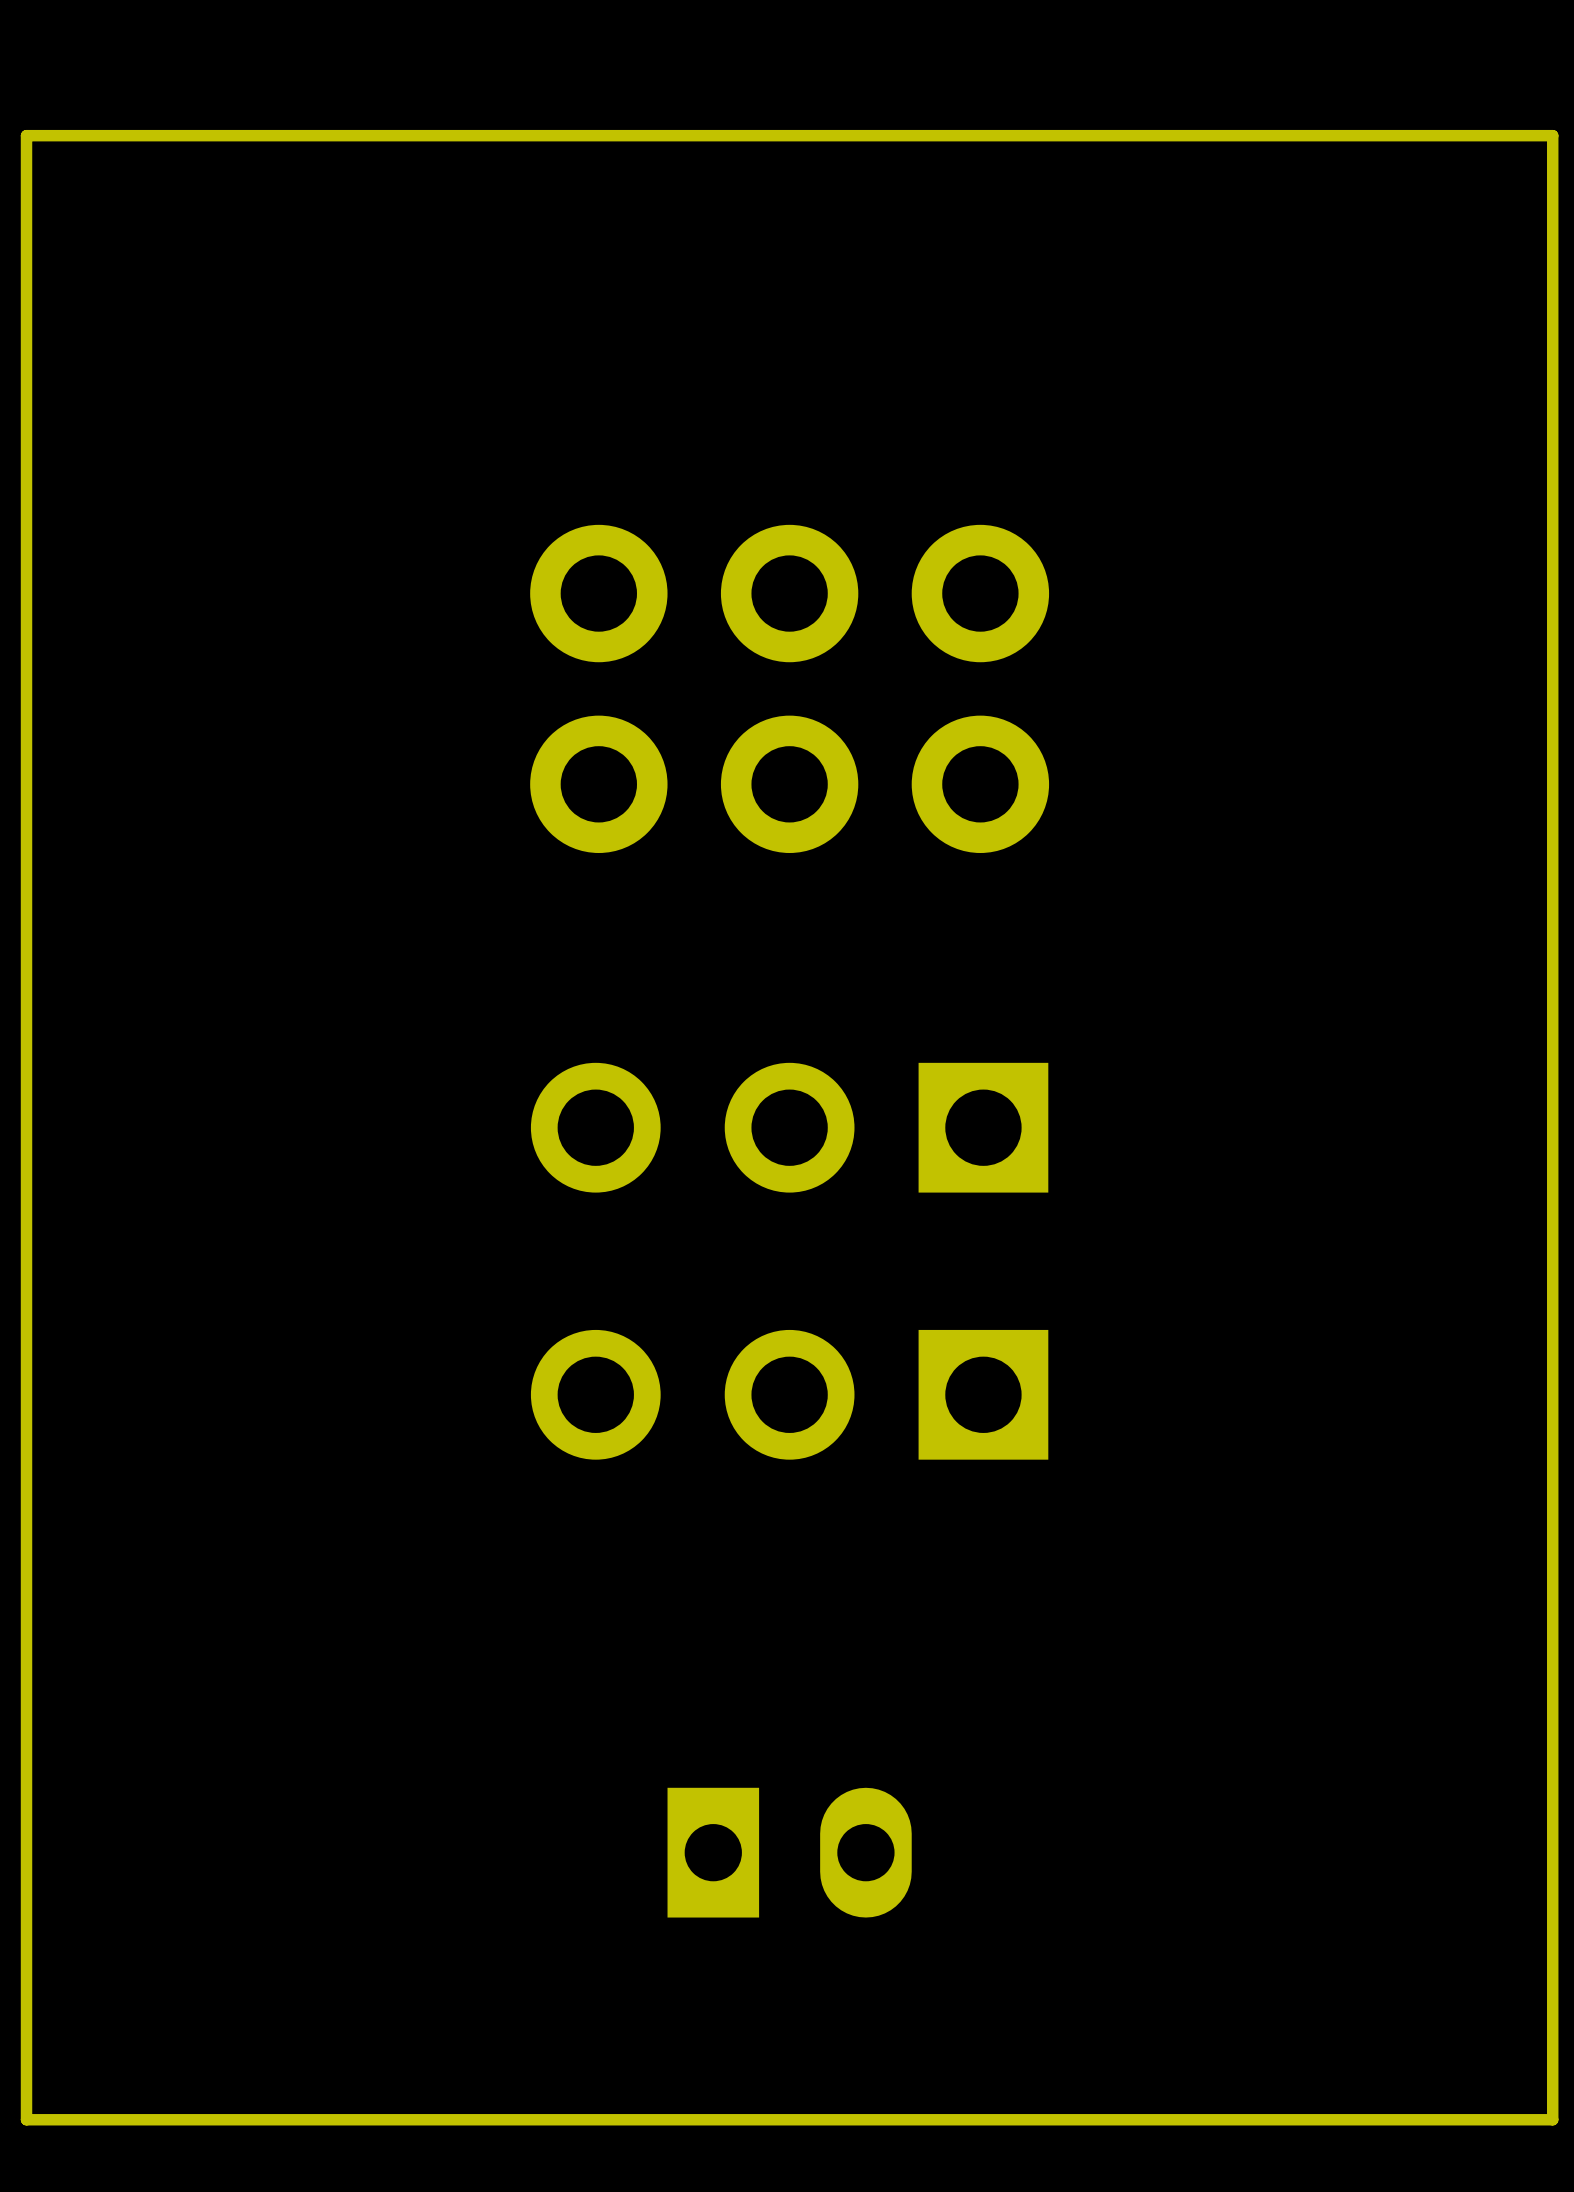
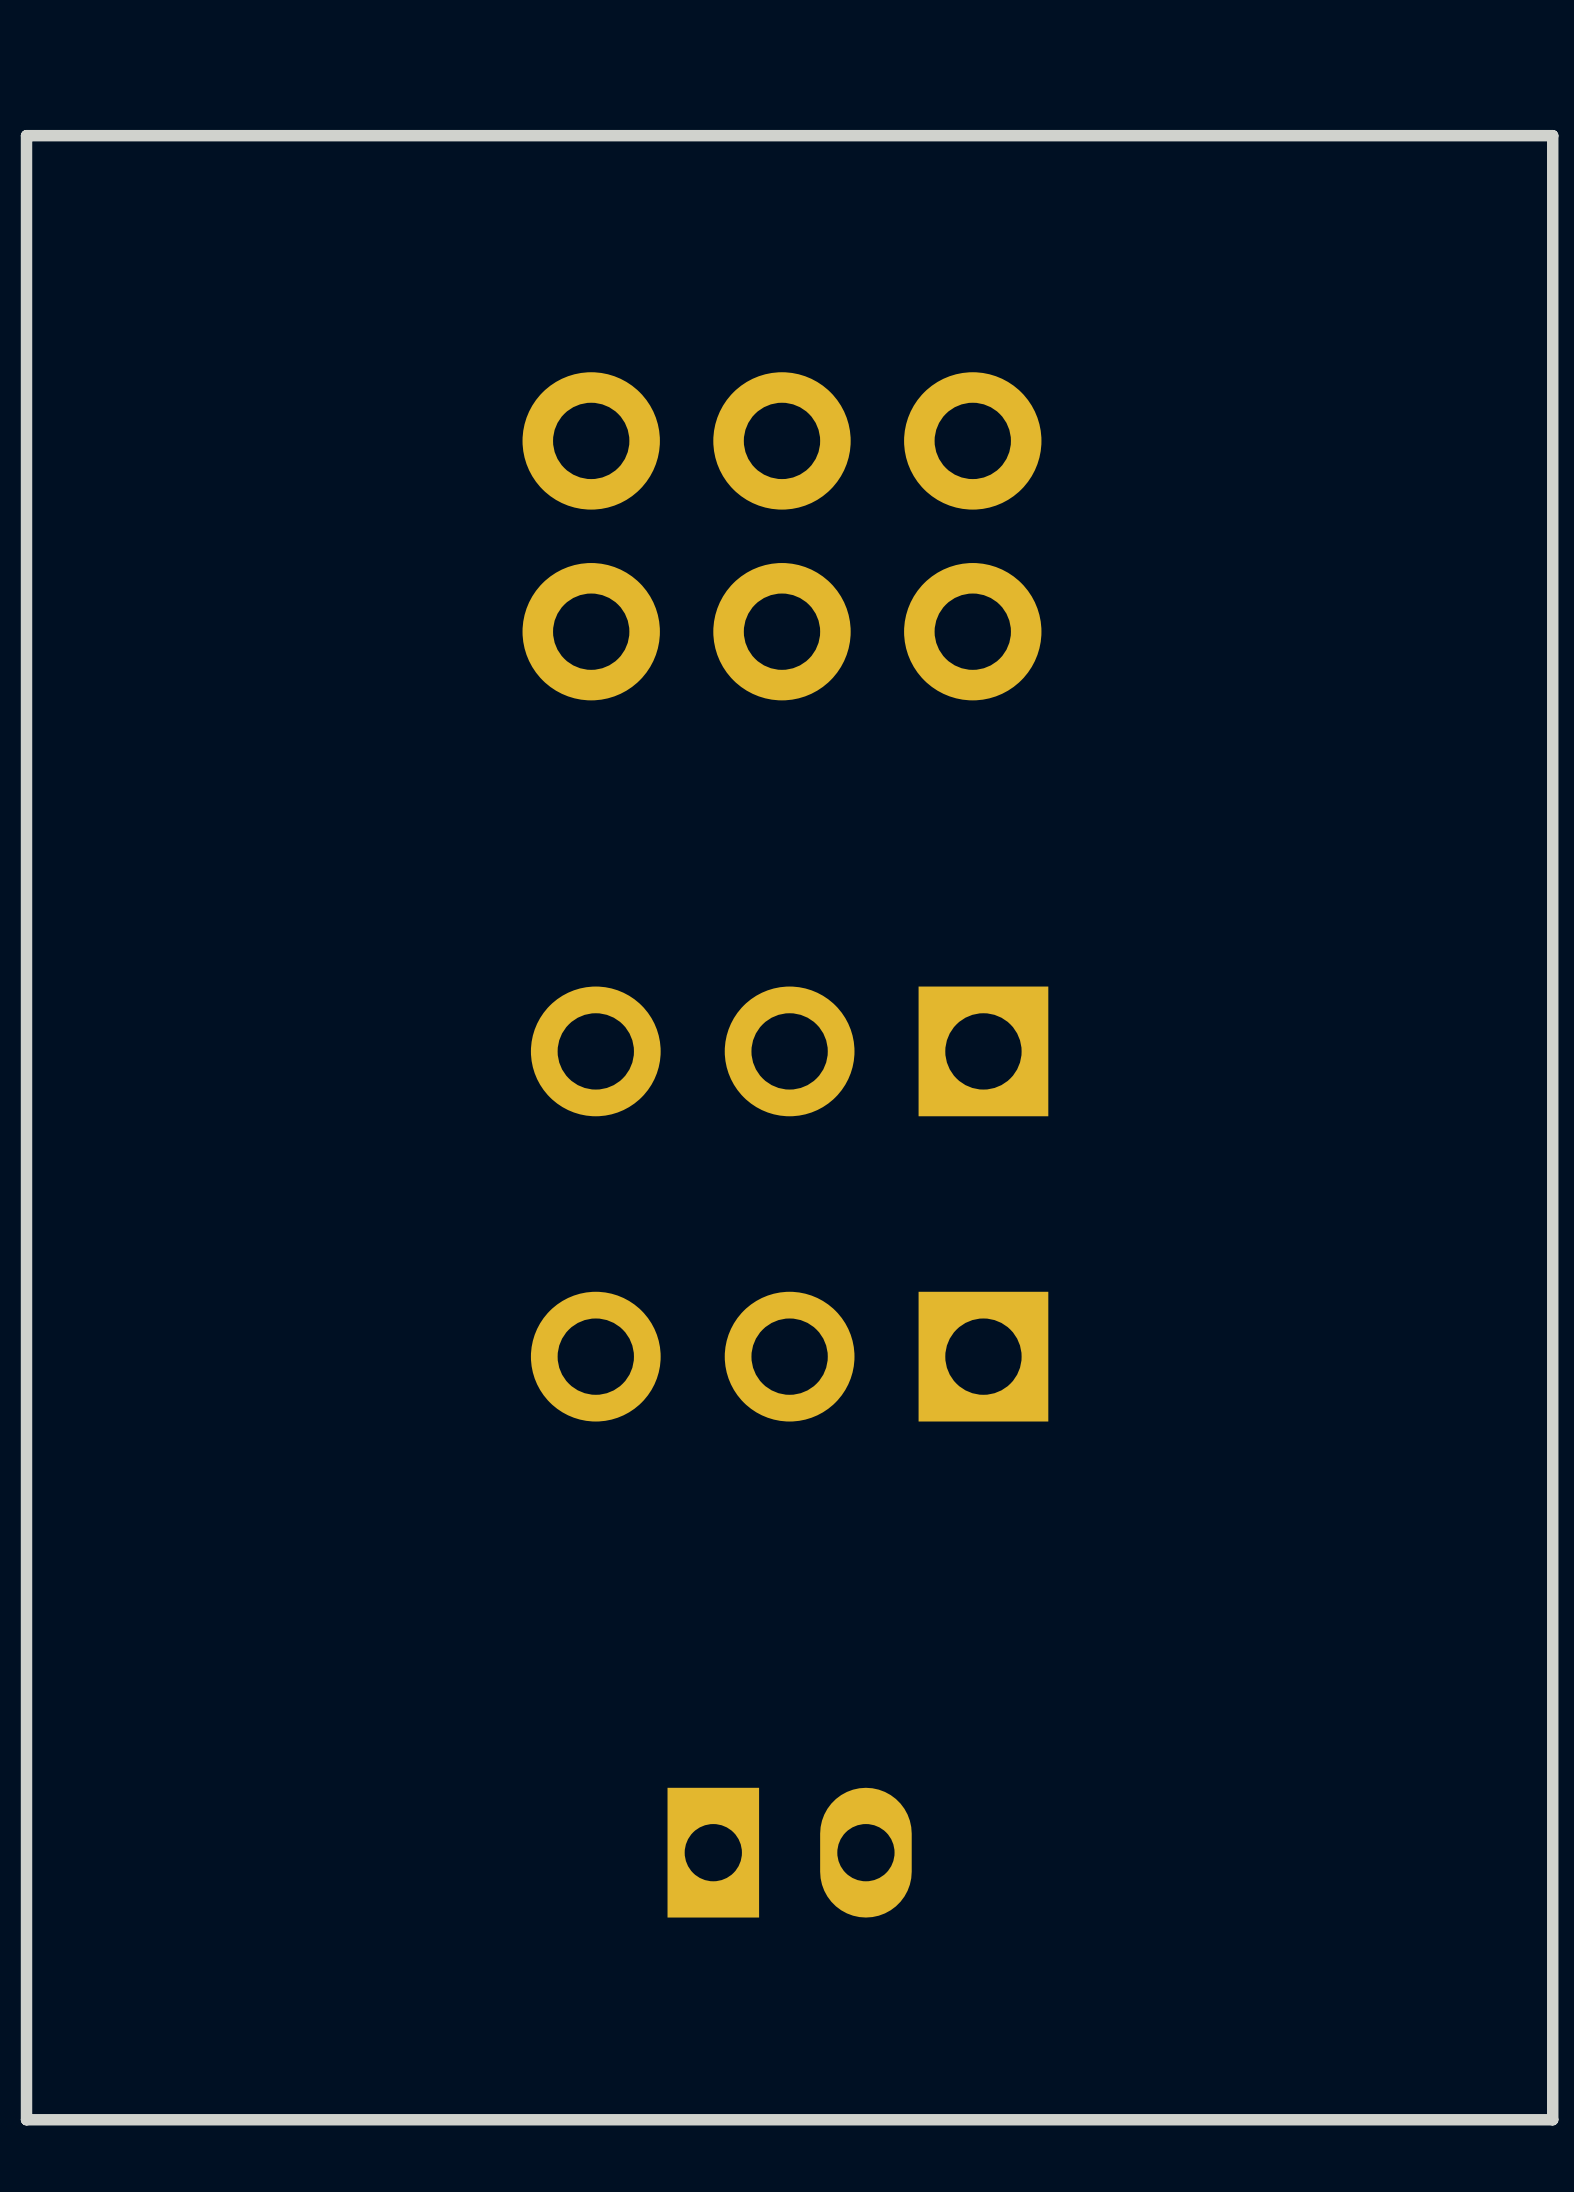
part position: (789, 688) -> (781, 536)
part position: (789, 1127) -> (789, 1051)
part position: (789, 1394) -> (789, 1356)

